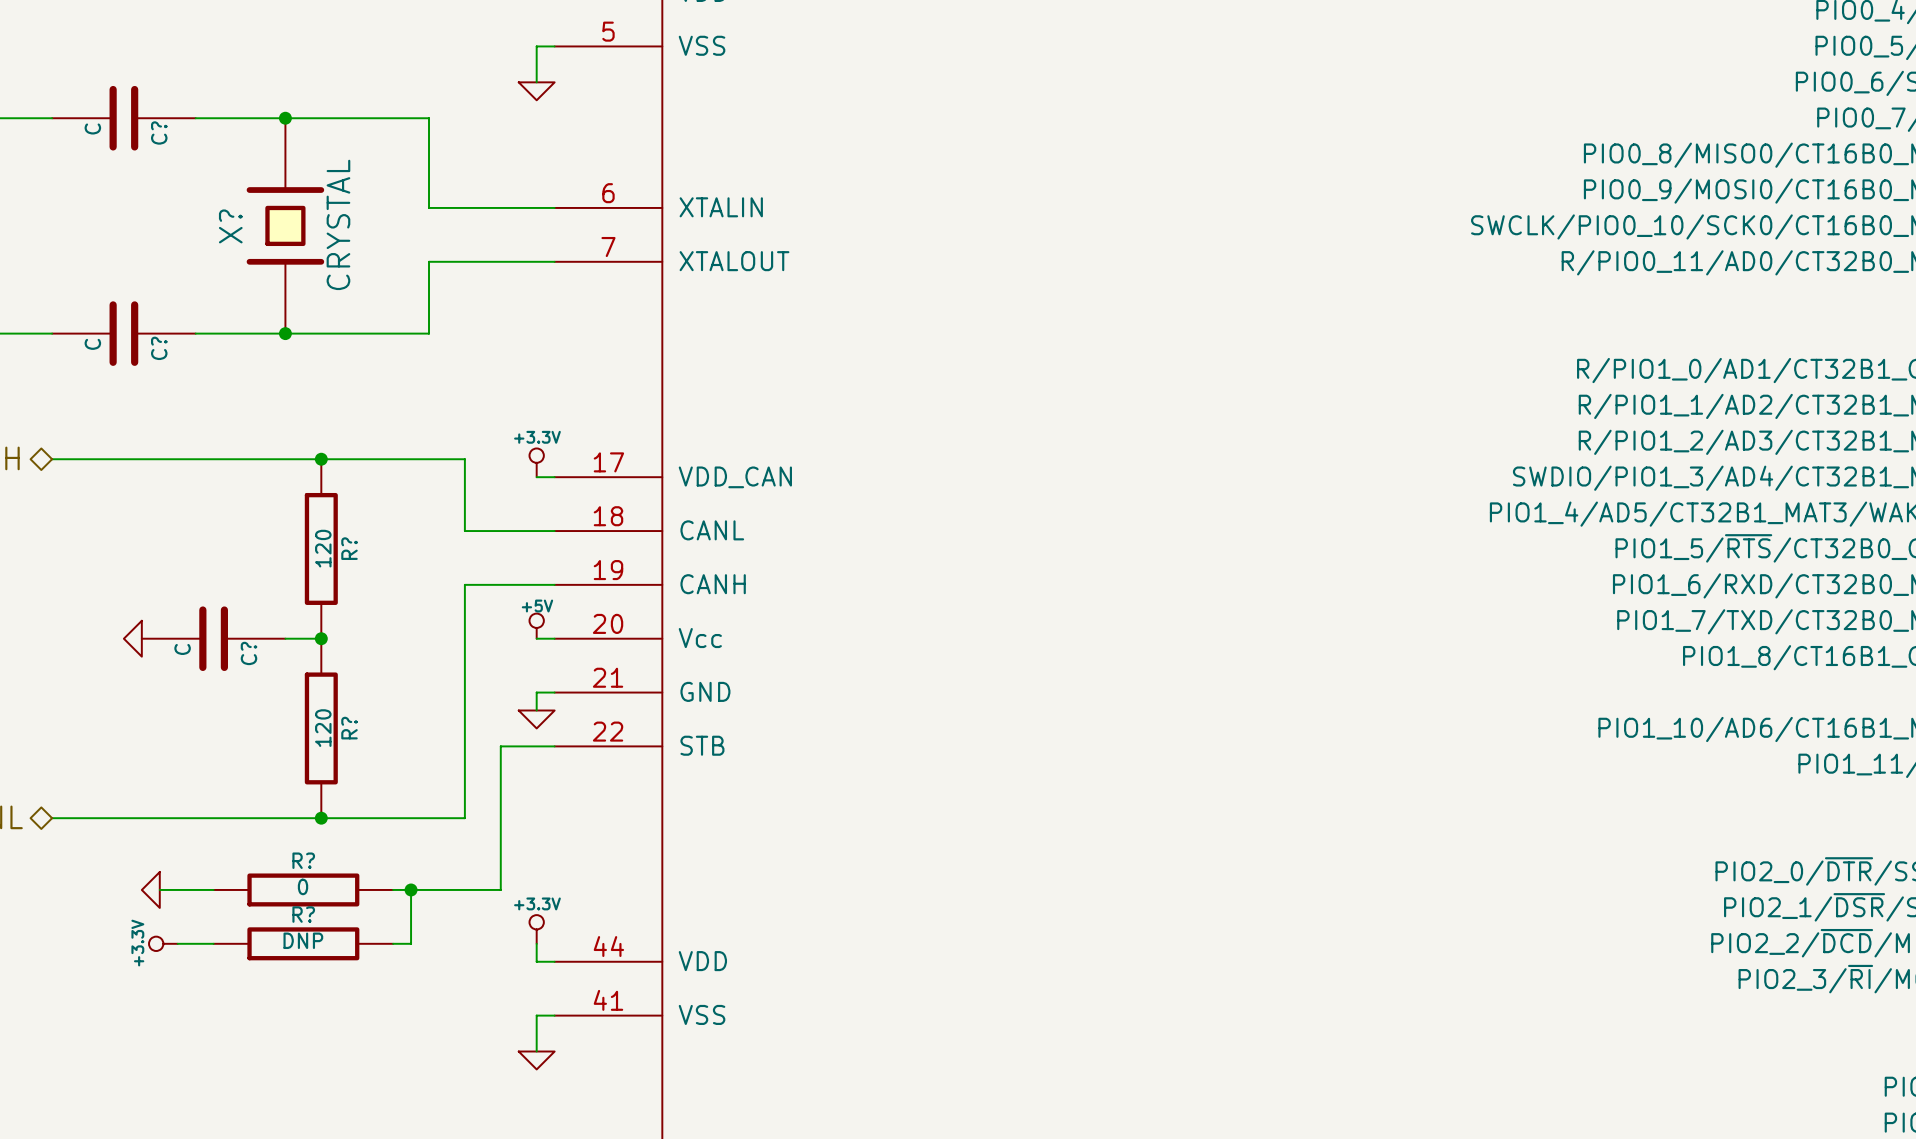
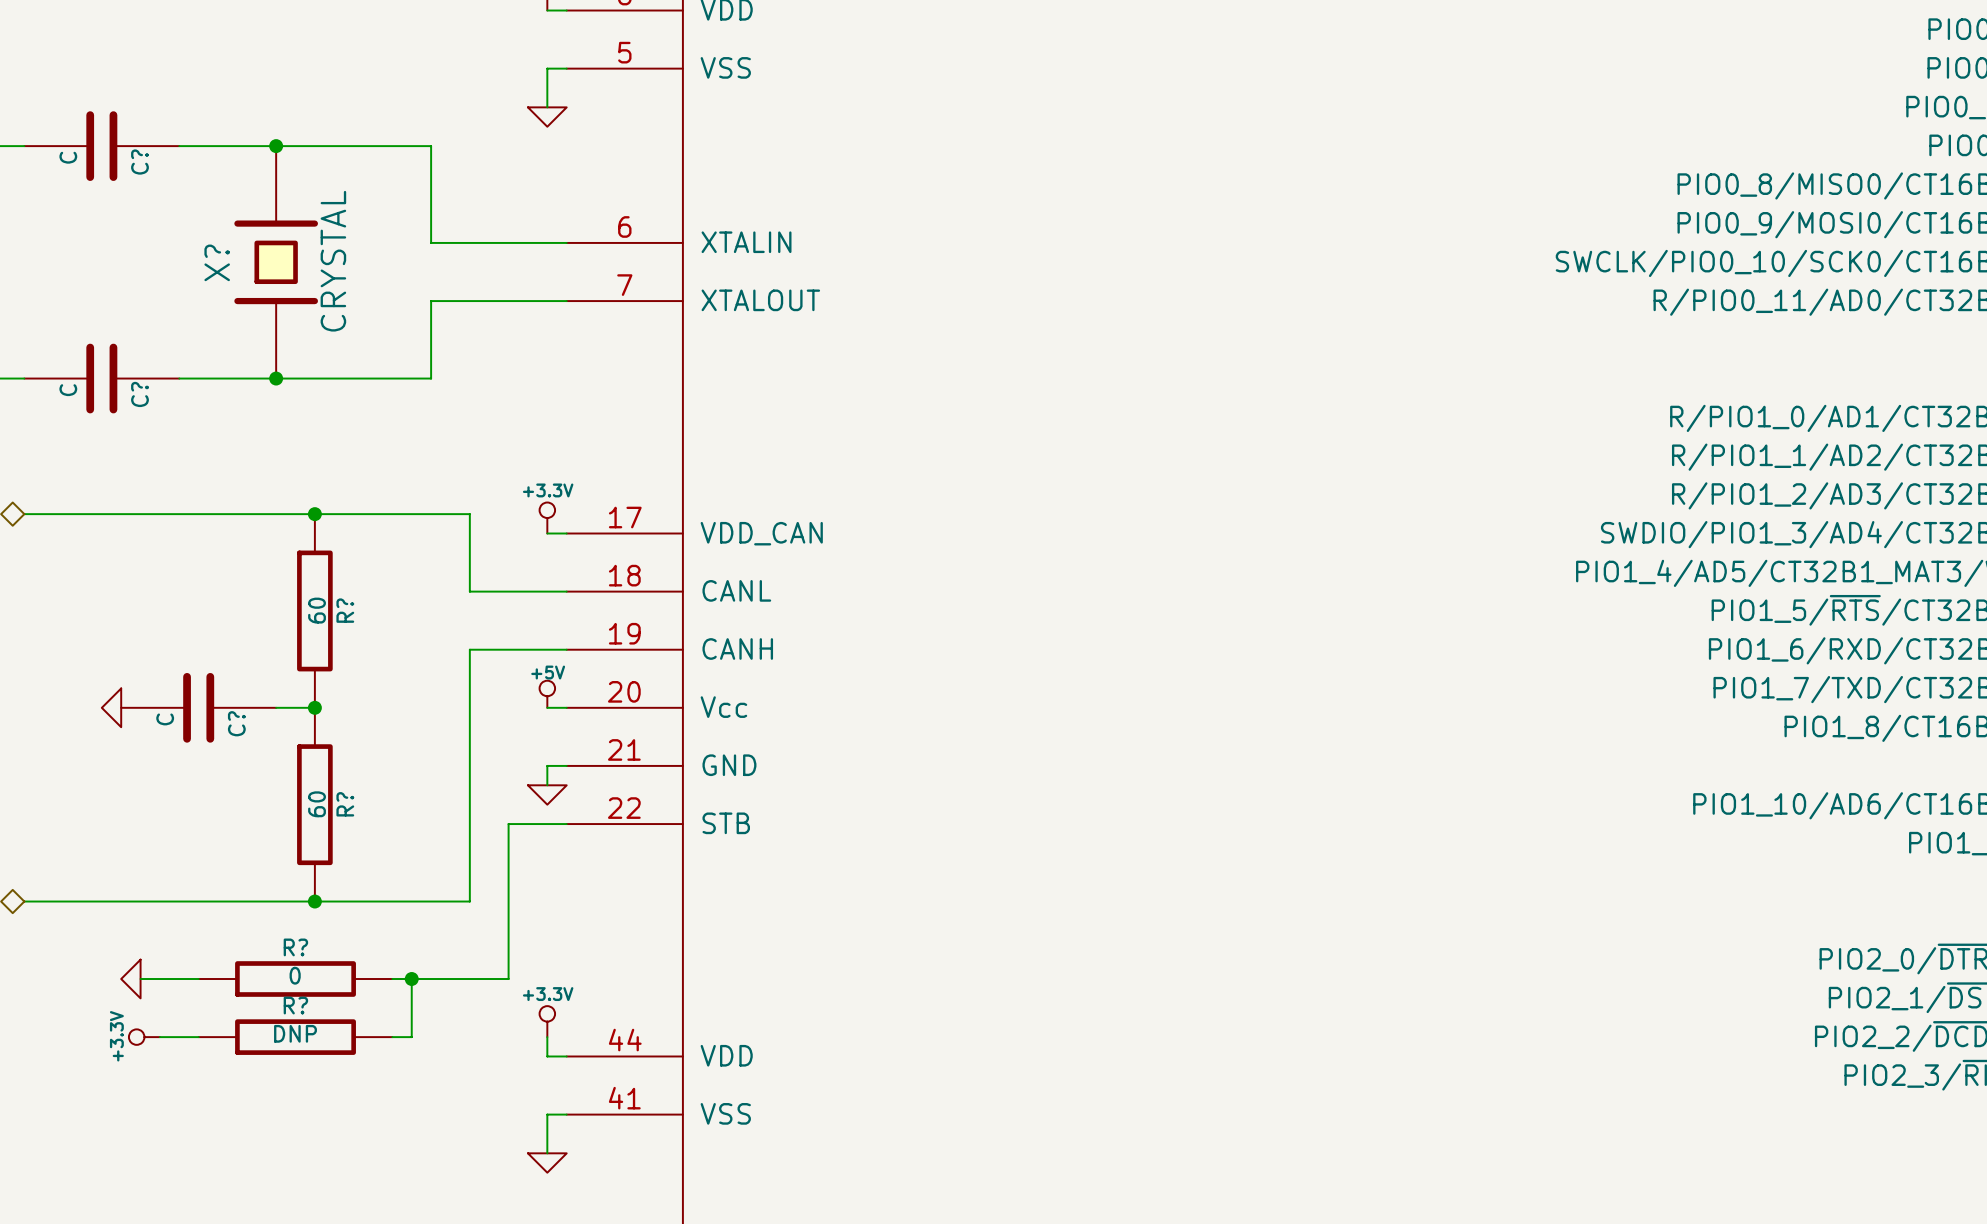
R? value: 120 (323, 548) -> 60 (317, 610)
R? value: 120 (323, 728) -> 60 (317, 804)

